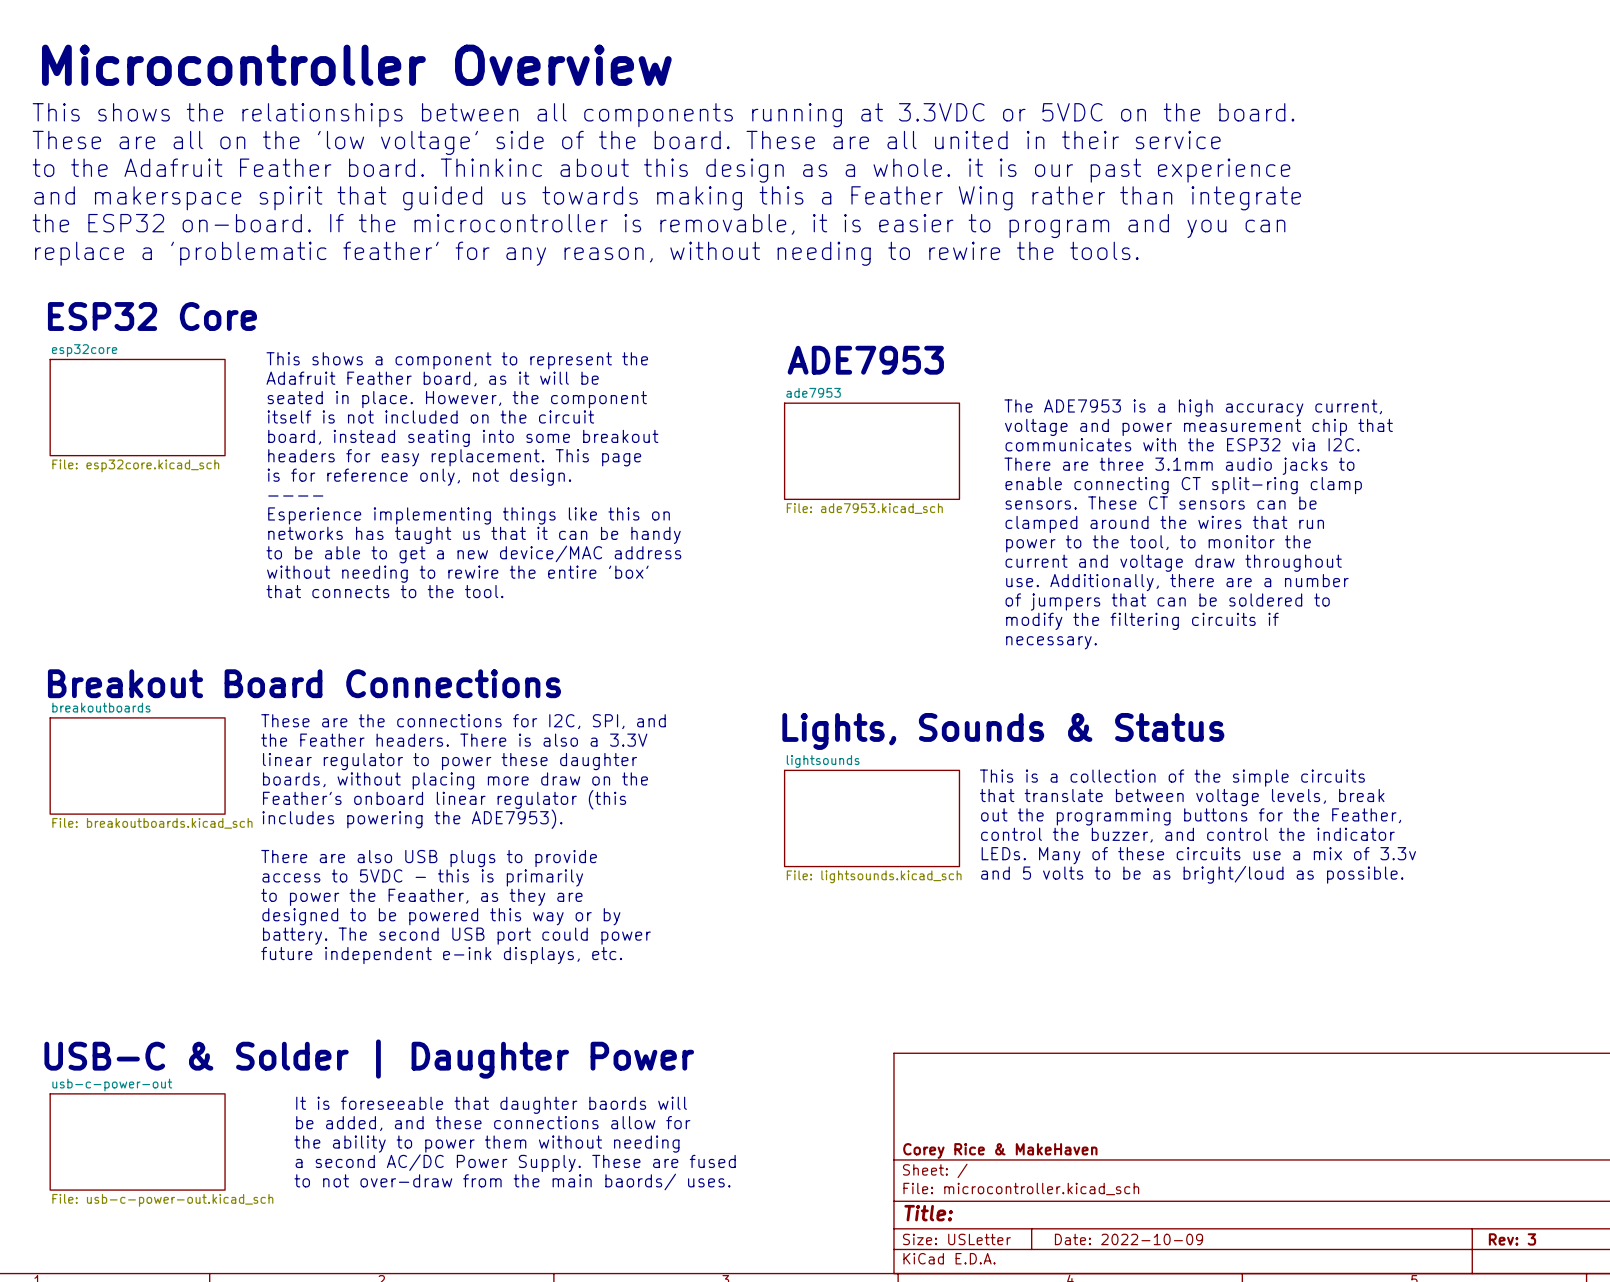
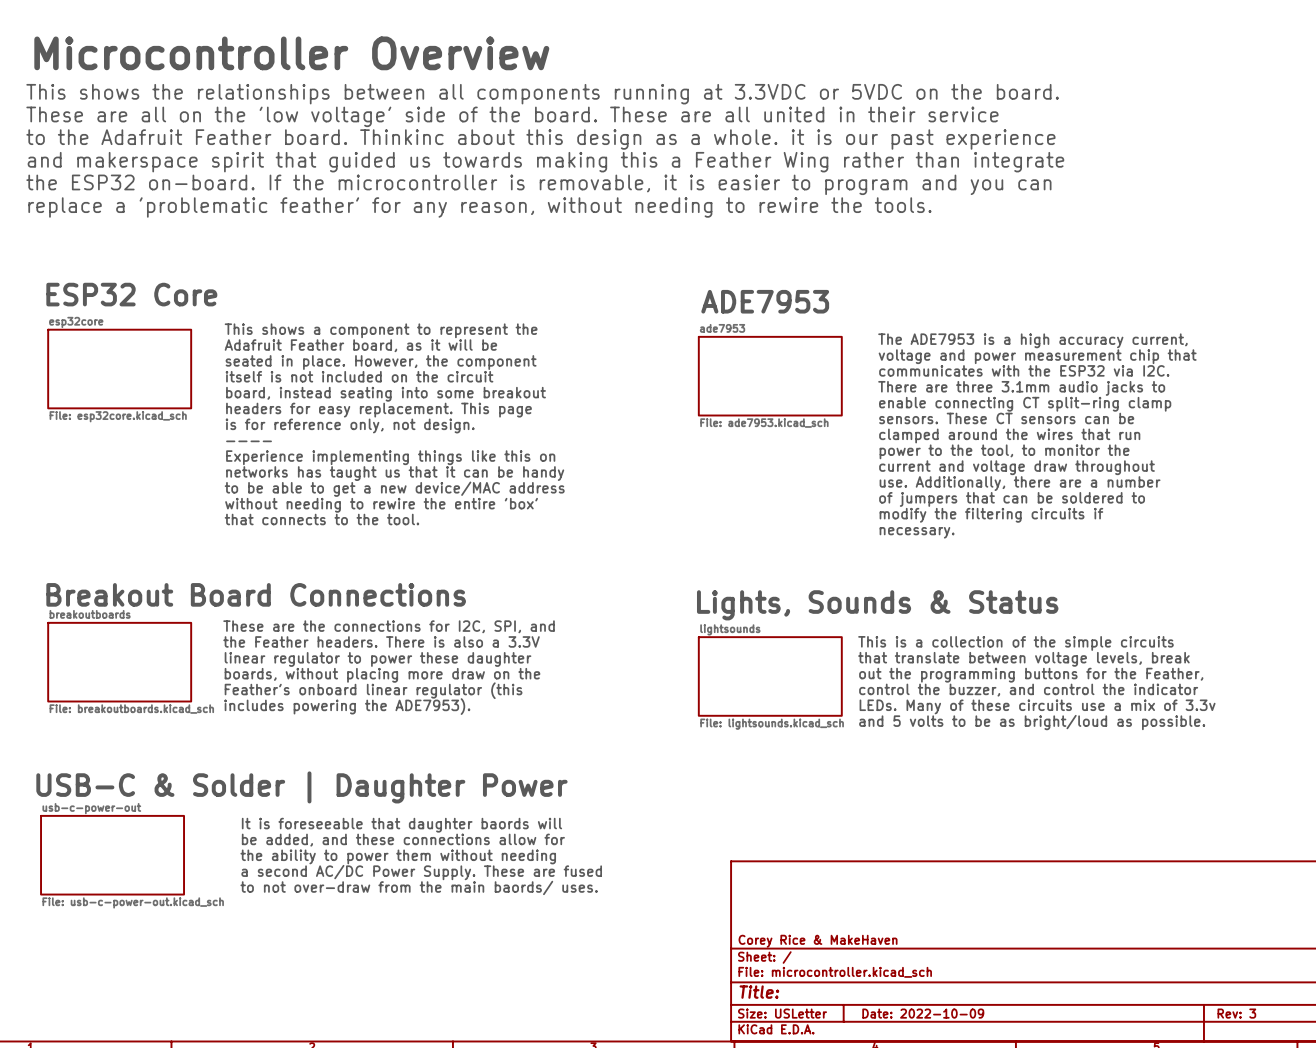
text position: ESP32 Core (152, 316) -> ESP32 Core (131, 294)
text position: This shows a component to represent the (457, 360) -> This shows a component to represent the (381, 330)
text position: ADE7953 (865, 360) -> ADE7953 (765, 301)
text position: Adafruit Feather board, as it will be (432, 379) -> Adafruit Feather board, as it will be (360, 345)
text position: seated in place. However, the component (457, 399) -> seated in place. However, the component (381, 362)
sheet esp32core position: (137, 407) -> (119, 369)
text position: The ADE7953 is a high accuracy current, (1193, 408) -> The ADE7953 is a high accuracy current, (1032, 340)
text position: itself is not included on the circuit (430, 416) -> itself is not included on the circuit (359, 376)
text position: voltage and power measurement chip that (1198, 427) -> voltage and power measurement chip that (1037, 356)
text position: board, instead seating into some breakout (463, 438) -> board, instead seating into some breakout (386, 394)
text position: communicates with the ESP32 via I2C. (1182, 444) -> communicates with the ESP32 via I2C. (1024, 370)
sheet ade7953 position: (872, 451) -> (770, 376)
text position: headers for easy replacement. This page (454, 457) -> headers for easy replacement. This page (378, 410)
text position: There are three 3.1mm audio jacks to (1179, 466) -> There are three 3.1mm audio jacks to (1021, 388)
text position: is for reference only, not design. (419, 477) -> is for reference only, not design. (350, 425)
text position: enable connecting CT split-ring clamp (1183, 485) -> enable connecting CT split-ring clamp (1025, 404)
text position: ---- (295, 496) -> ---- (249, 441)
text position: sensors. These CT sensors can be (1161, 502) -> sensors. These CT sensors can be (1006, 418)
text: Esperience implementing things like this on (469, 515) -> none
text position: clamped around the wires that run (1164, 524) -> clamped around the wires that run (1009, 435)
text position: networks has taught us that it can be handy (474, 535) -> networks has taught us that it can be handy (395, 473)
text position: power to the tool, to monitor the (1158, 543) -> power to the tool, to monitor the (1004, 451)
text position: to be able to get a new device/MAC address (473, 554) -> to be able to get a new device/MAC address (394, 489)
text: none -> Experience implementing things like this on (390, 457)
text position: current and voltage draw throughout (1173, 563) -> current and voltage draw throughout (1017, 467)
text position: without needing to rewire the entire 'box' (457, 574) -> without needing to rewire the entire 'box' (381, 505)
text position: use. Additionally, there are a number (1177, 582) -> use. Additionally, there are a number (1020, 483)
text position: that connects to the tool. (384, 591) -> that connects to the tool. (321, 519)
text position: of jumpers that can be soldered to (1167, 601) -> of jumpers that can be soldered to (1012, 499)
text position: modify the filtering circuits if (1142, 621) -> modify the filtering circuits if (991, 515)
text position: necessary. (1051, 642) -> necessary. (917, 532)
text position: Breakout Board Connections (304, 683) -> Breakout Board Connections (256, 594)
text position: These are the connections for I2C, SPI, and (463, 721) -> These are the connections for I2C, SPI, and (389, 626)
text position: Lights, Sounds & Status (1003, 731) -> Lights, Sounds & Status (877, 605)
text position: the Feather headers. There is also a 3.3V (454, 740) -> the Feather headers. There is also a 3.3V (381, 641)
text position: linear regulator to power these daughter (450, 761) -> linear regulator to power these daughter (378, 659)
sheet breakoutboards position: (137, 766) -> (119, 662)
text position: This is a collection of the simple circuits (1172, 778) -> This is a collection of the simple circuits (1015, 643)
text position: boards, without placing more draw on the (455, 780) -> boards, without placing more draw on the (382, 675)
text position: that translate between voltage levels, break (1182, 797) -> that translate between voltage levels, break (1023, 659)
text position: Feather's onboard linear regulator (this (444, 799) -> Feather's onboard linear regulator (this (373, 690)
text position: out the programming buttons for the Feather, (1191, 816) -> out the programming buttons for the Feather, (1031, 675)
sheet lightsounds position: (872, 818) -> (770, 676)
text position: includes powering the ADE7953). (412, 819) -> includes powering the ADE7953). (347, 706)
text position: control the buzzer, and control the indicator (1187, 835) -> control the buzzer, and control the indicator (1028, 690)
text position: LEDs. Many of these circuits use a mix of 3.3v (1198, 855) -> LEDs. Many of these circuits use a mix of 3.3v (1037, 706)
text: There are also USB plugs to provide (429, 858) -> none
text position: and 5 volts to be as bright/loud as possible. (1192, 874) -> and 5 volts to be as bright/loud as possible. (1032, 722)
text: access to 5VDC - this is primarily (422, 877) -> none
text: to power the Feaather, as they are (421, 897) -> none
text: designed to be powered this way or by (441, 916) -> none
text: battery. The second USB port could power (456, 936) -> none
text: future independent e-ink displays, etc. (441, 955) -> none
text position: USB-C & Solder | Daughter Power (369, 1059) -> USB-C & Solder | Daughter Power (301, 787)
text position: It is foreseeable that daughter baords will (491, 1105) -> It is foreseeable that daughter baords will (401, 825)
text position: be added, and these connections allow for (493, 1123) -> be added, and these connections allow for (403, 840)
sheet usb-c-power-out position: (137, 1141) -> (112, 855)
text position: the ability to power them without needing (486, 1144) -> the ability to power them without needing (398, 856)
text position: a second AC/DC Power Supply. These are fused (515, 1163) -> a second AC/DC Power Supply. These are fused (421, 872)
text position: to not over-draw from the main baords/ uses. (512, 1181) -> to not over-draw from the main baords/ uses. (419, 887)

